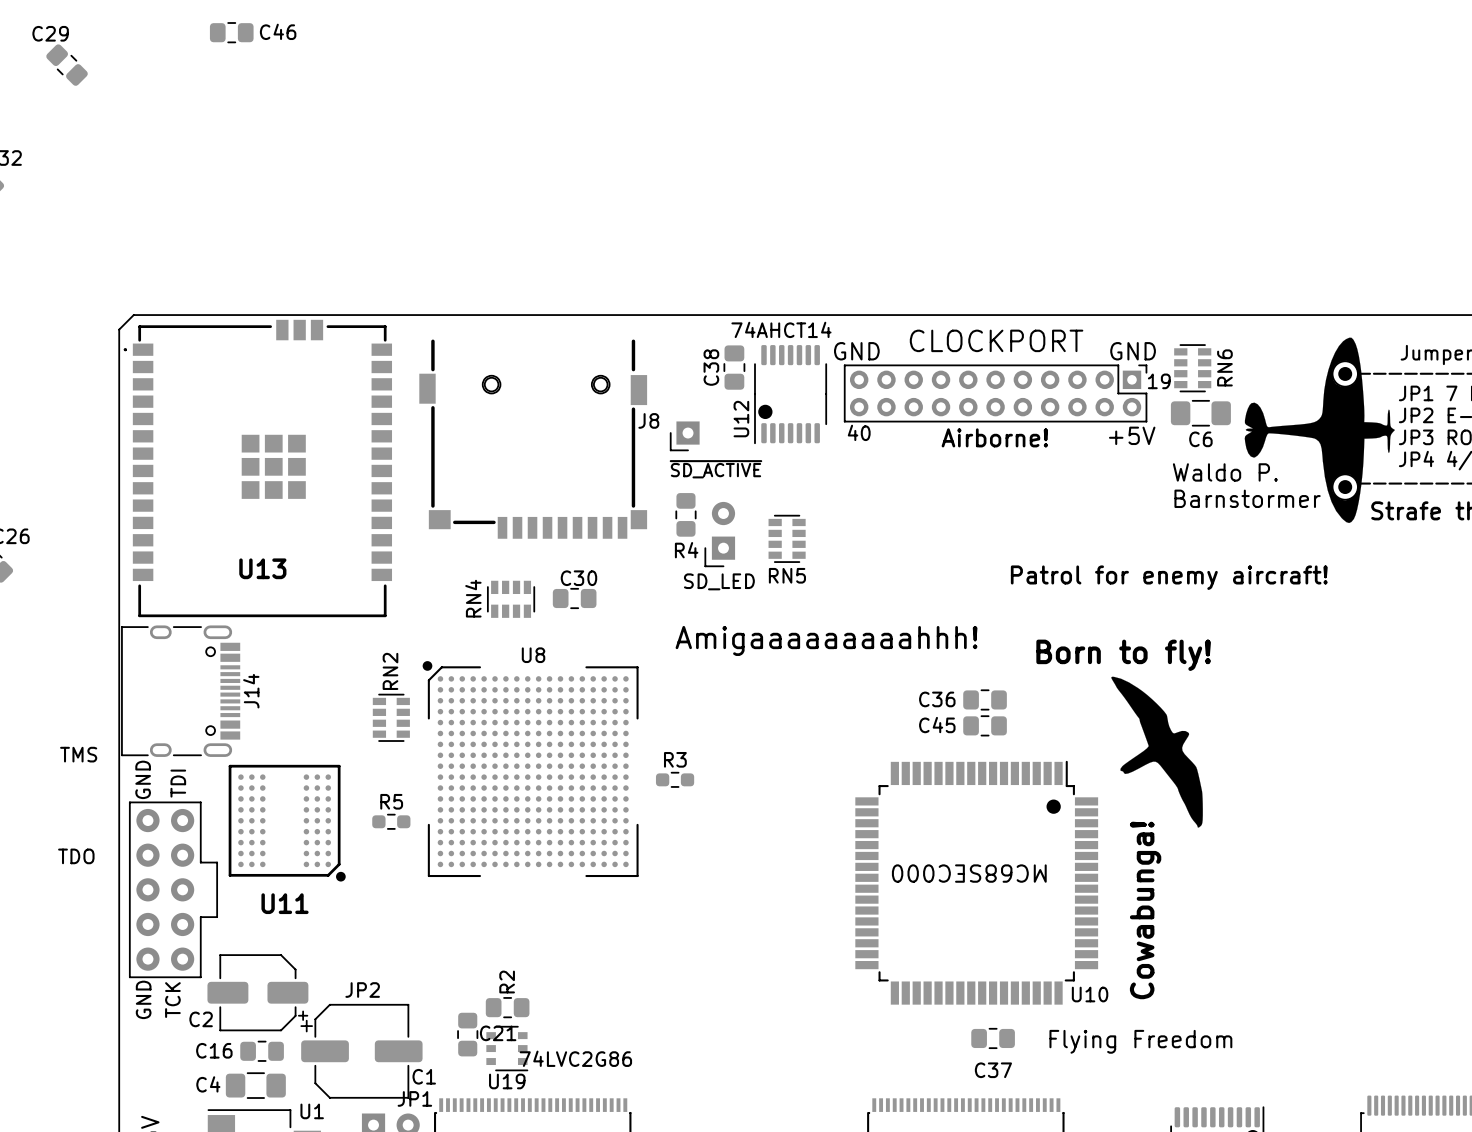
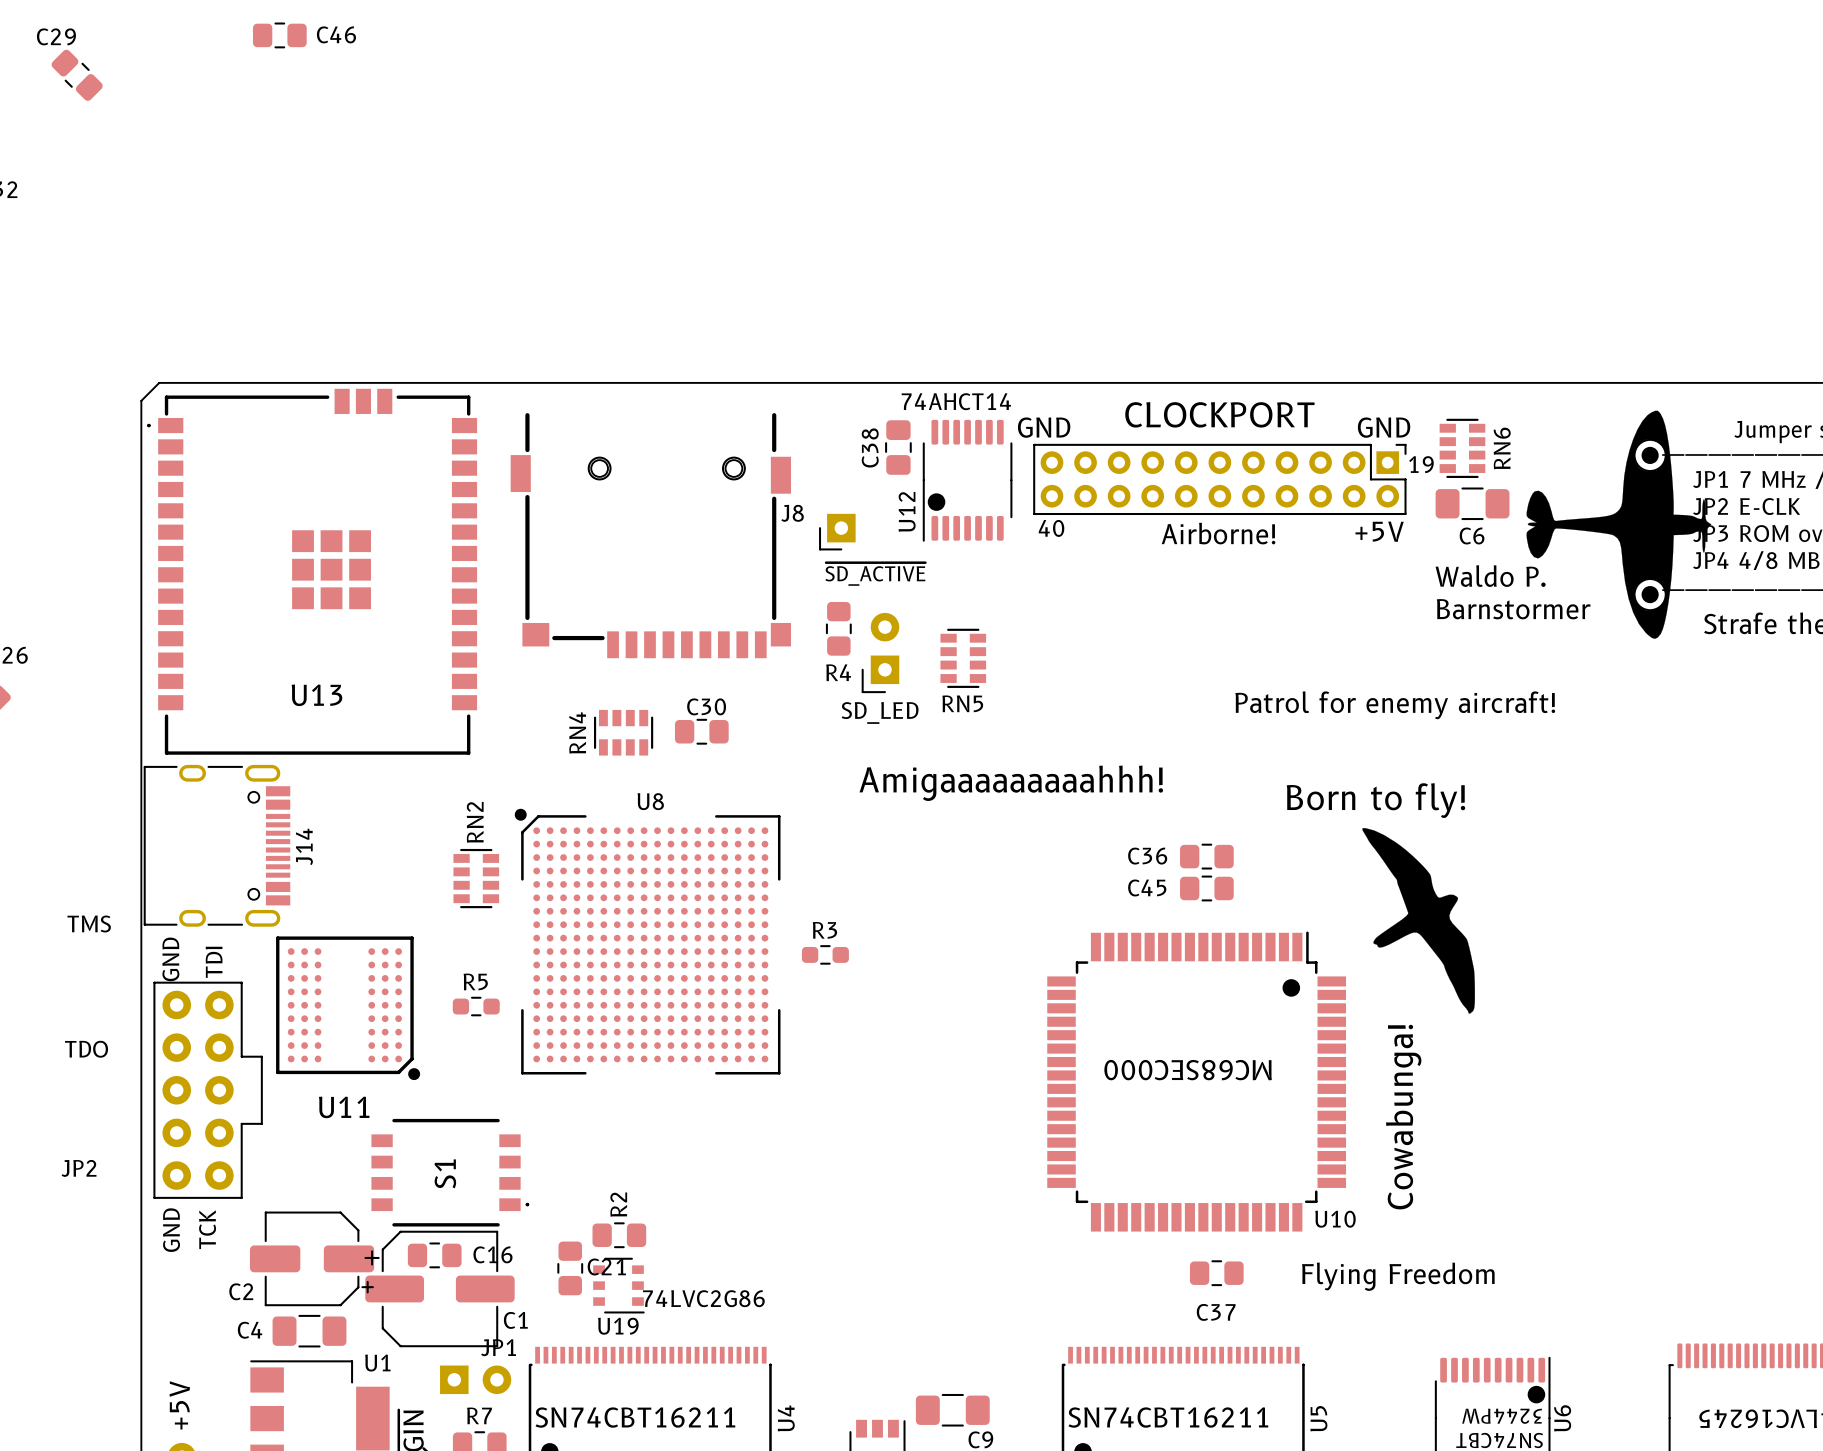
S1: none -> (450, 1172)
text position: JP2 (362, 990) -> JP2 (79, 1168)
C2 position: (257, 992) -> (312, 1258)
C16 name position: C16 (214, 1050) -> C16 (492, 1254)
C16 position: (262, 1051) -> (434, 1255)

